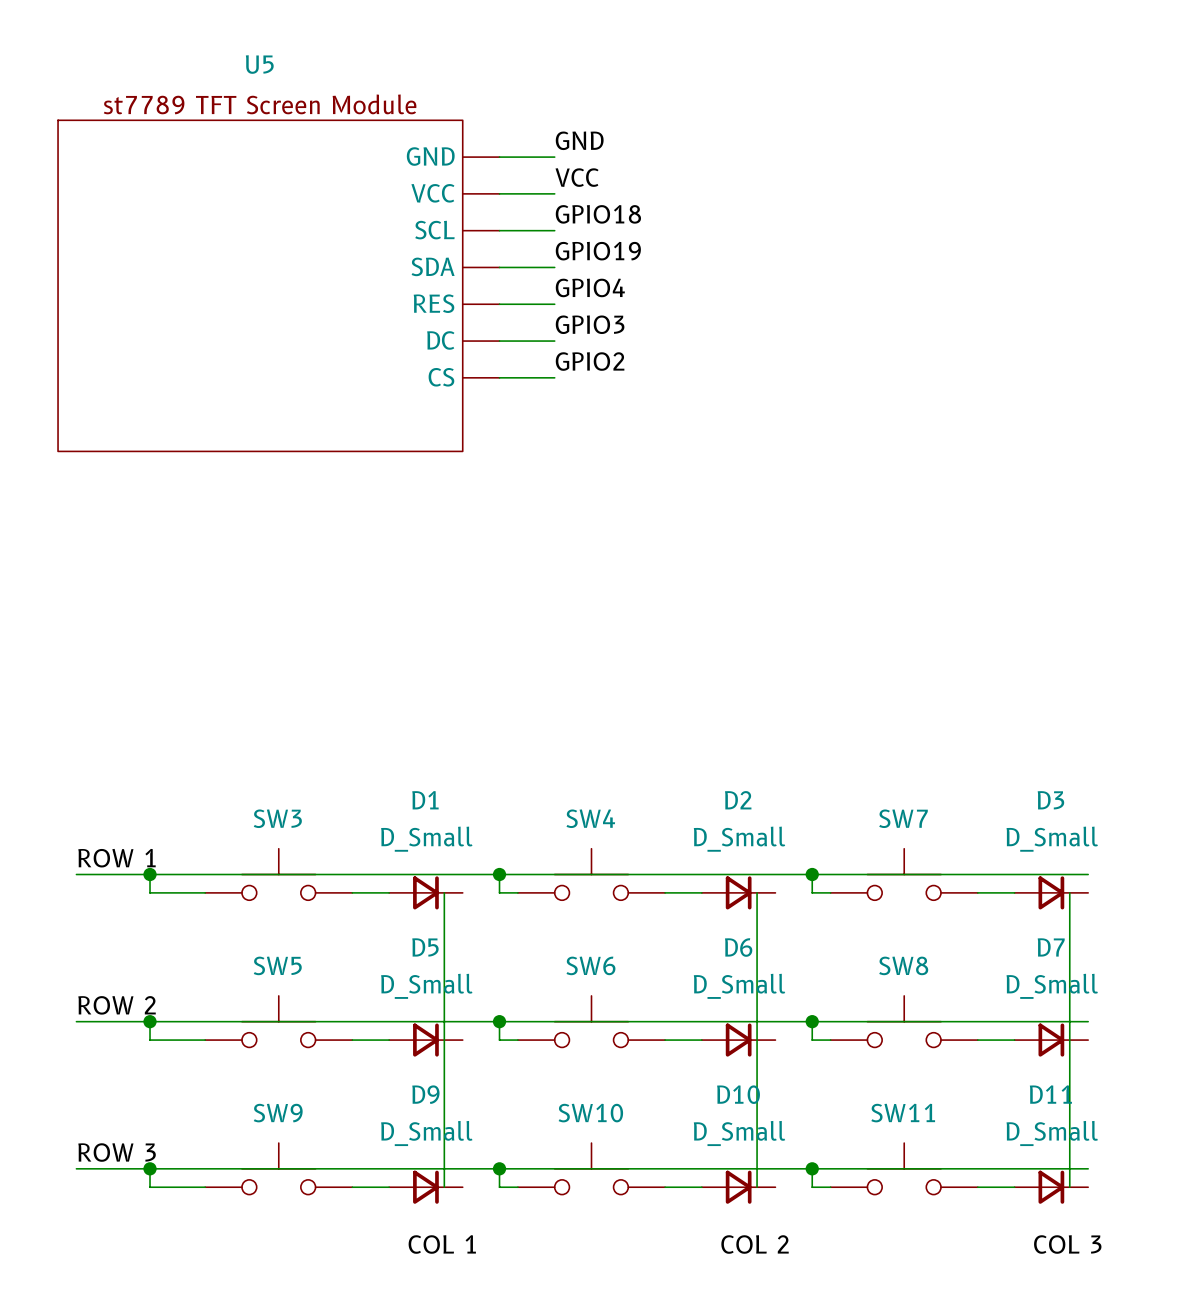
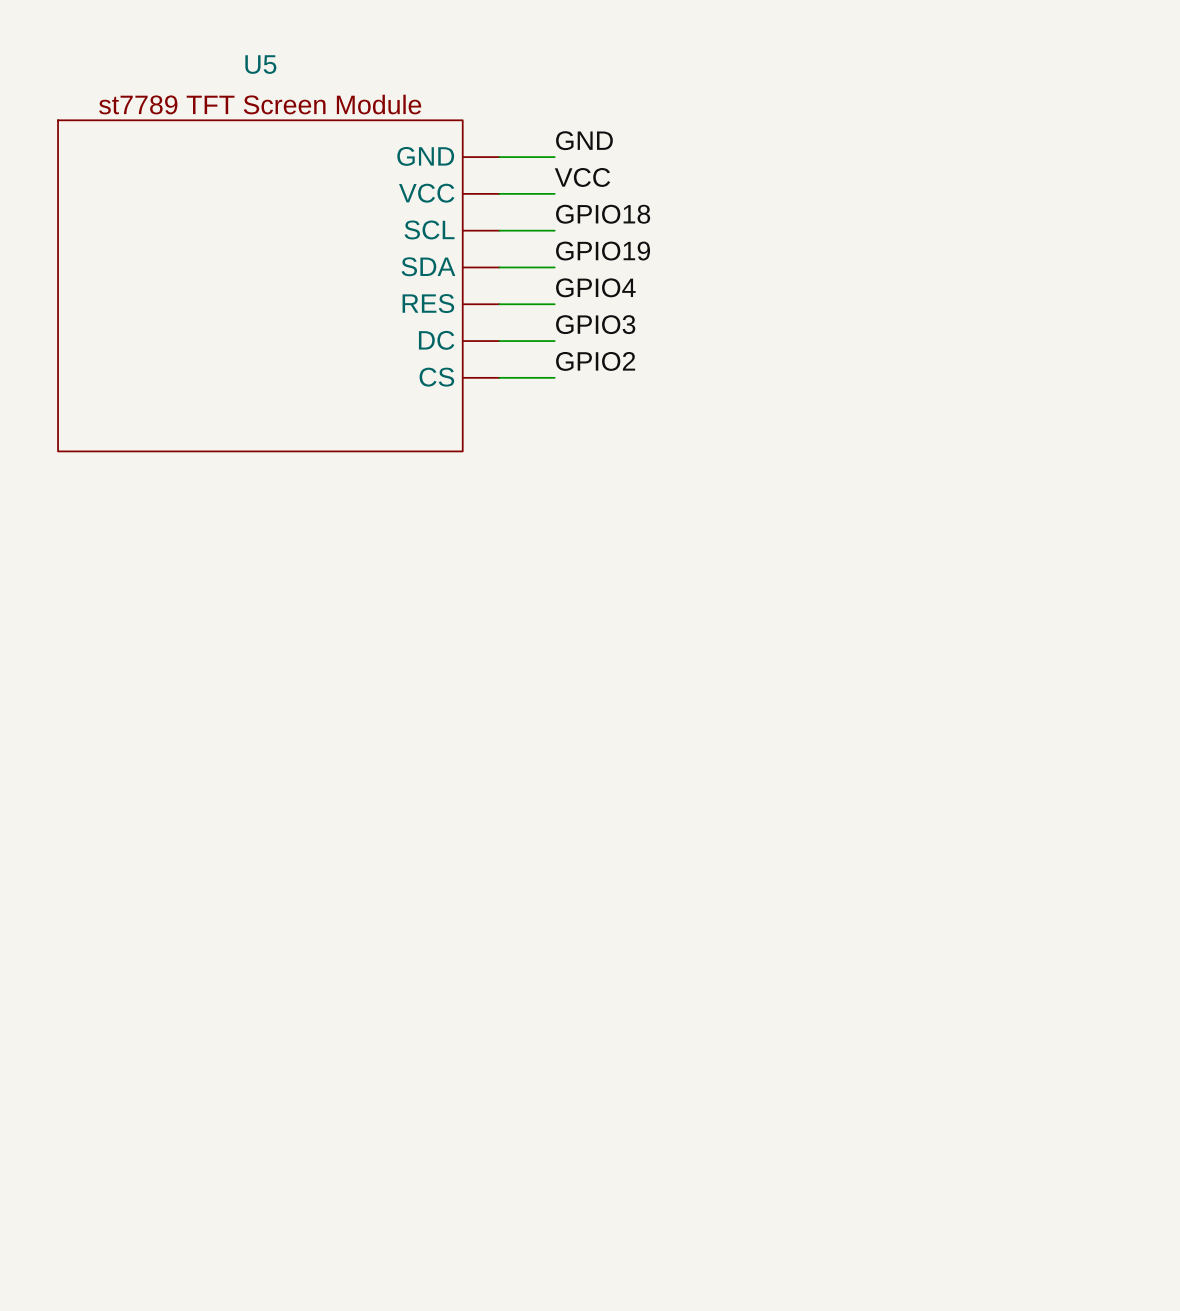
label: ROW 1 (117, 858) -> none
wire: (76, 874) (1088, 874) -> none
wire: (150, 874) (150, 892) (205, 892) -> none
junction: (150, 874) -> none
SW3: (278, 874) -> none
wire: (499, 874) (499, 892) (517, 892) -> none
junction: (499, 874) -> none
SW4: (591, 874) -> none
wire: (812, 874) (812, 892) (830, 892) -> none
junction: (812, 874) -> none
SW7: (904, 874) -> none
wire: (352, 892) (389, 892) -> none
D1: D_Small (425, 892) -> none
wire: (444, 892) (444, 1187) -> none
wire: (665, 892) (701, 892) -> none
D2: D_Small (738, 892) -> none
wire: (757, 892) (757, 1187) -> none
wire: (977, 892) (1014, 892) -> none
D3: D_Small (1051, 892) -> none
wire: (1069, 892) (1069, 1187) -> none
label: ROW 2 (117, 1005) -> none
wire: (76, 1021) (1088, 1021) -> none
wire: (150, 1021) (150, 1040) (205, 1040) -> none
junction: (150, 1021) -> none
SW5: (278, 1021) -> none
wire: (499, 1021) (499, 1040) (517, 1040) -> none
junction: (499, 1021) -> none
SW6: (591, 1021) -> none
wire: (812, 1021) (812, 1040) (830, 1040) -> none
junction: (812, 1021) -> none
SW8: (904, 1021) -> none
wire: (352, 1040) (389, 1040) -> none
D5: D_Small (425, 1040) -> none
wire: (665, 1040) (701, 1040) -> none
D6: D_Small (738, 1040) -> none
wire: (977, 1040) (1014, 1040) -> none
D7: D_Small (1051, 1040) -> none
label: ROW 3 (117, 1152) -> none
wire: (76, 1168) (1088, 1168) -> none
wire: (150, 1168) (150, 1187) (205, 1187) -> none
junction: (150, 1168) -> none
SW9: (278, 1168) -> none
wire: (499, 1168) (499, 1187) (517, 1187) -> none
junction: (499, 1168) -> none
SW10: (591, 1168) -> none
wire: (812, 1168) (812, 1187) (830, 1187) -> none
junction: (812, 1168) -> none
SW11: (904, 1168) -> none
wire: (352, 1187) (389, 1187) -> none
D9: D_Small (425, 1187) -> none
wire: (665, 1187) (701, 1187) -> none
D10: D_Small (738, 1187) -> none
wire: (977, 1187) (1014, 1187) -> none
D11: D_Small (1051, 1187) -> none
label: COL 1 (442, 1244) -> none
label: COL 2 (755, 1244) -> none
label: COL 3 (1067, 1244) -> none

